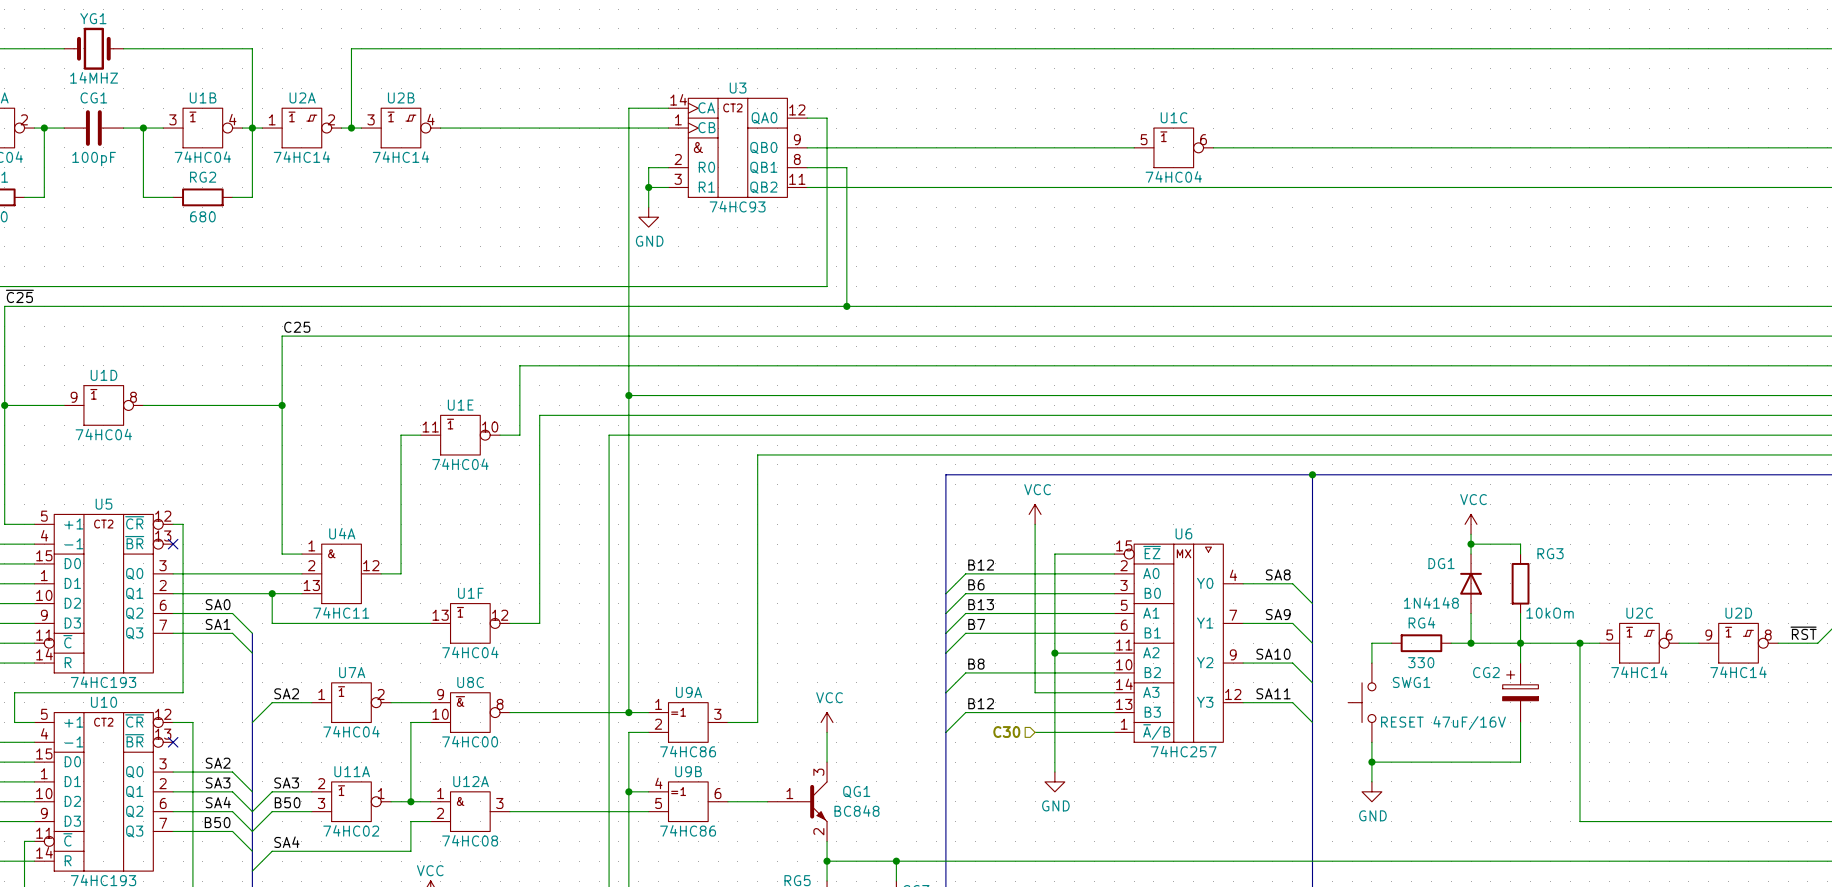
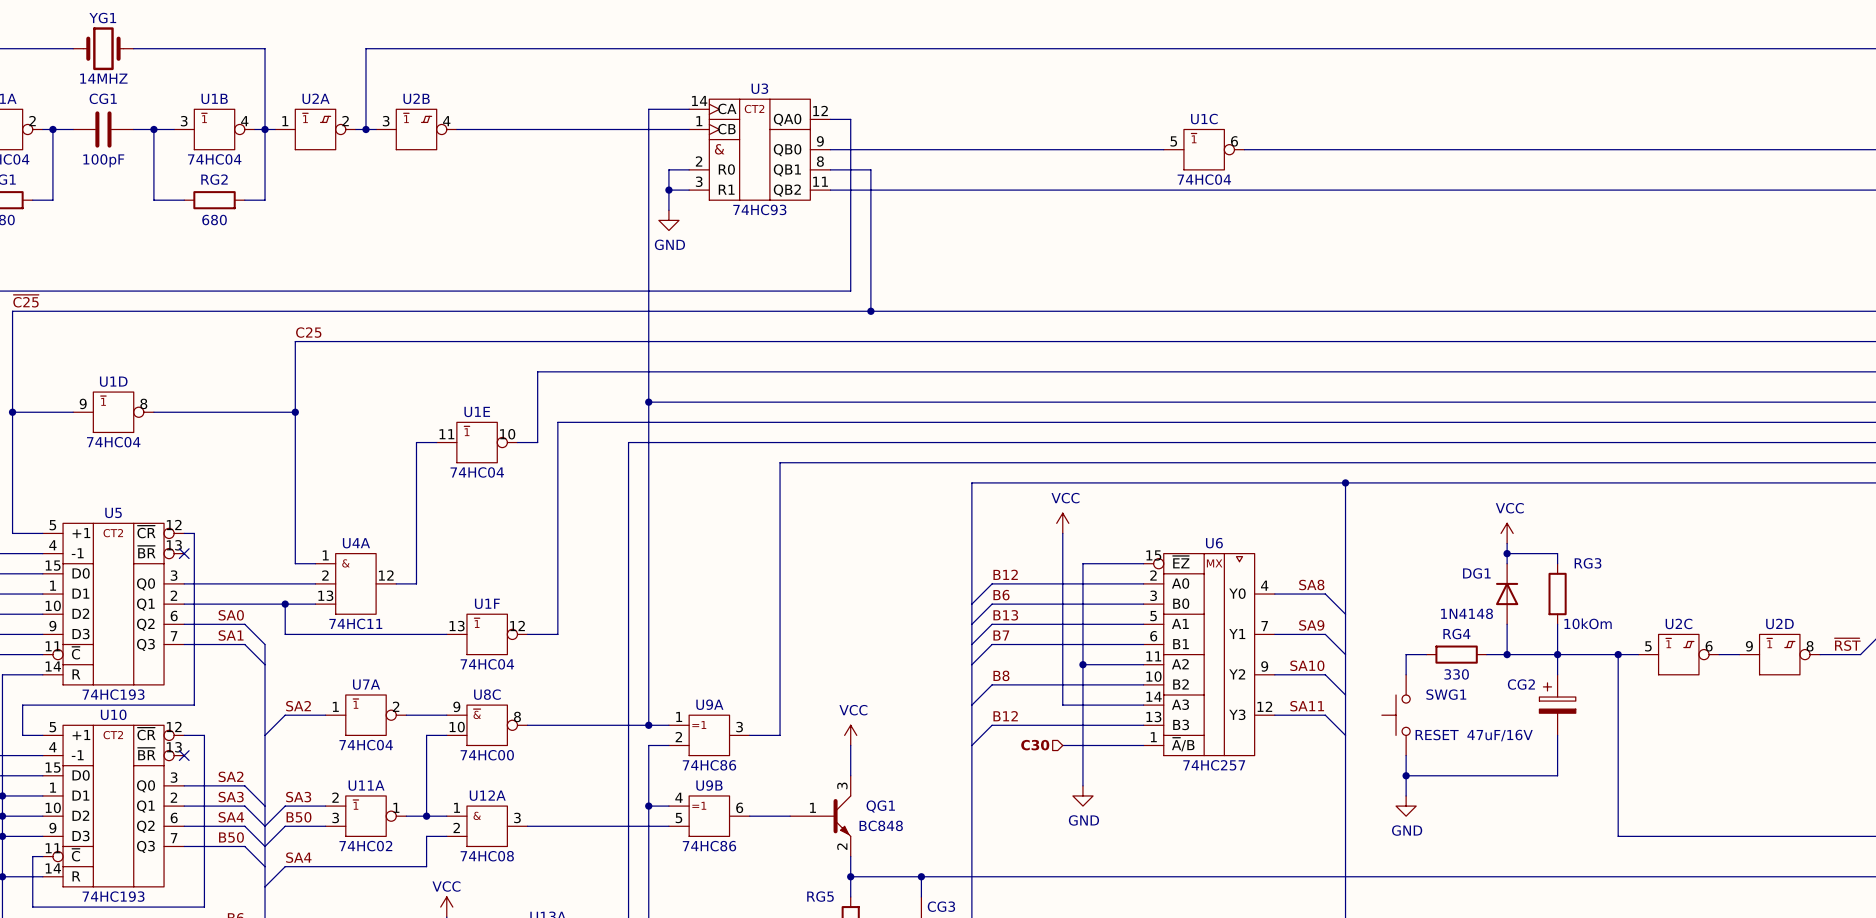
U2A value: 74HC14 (301, 157) -> none
U2B value: 74HC14 (401, 157) -> none
U2C value: 74HC14 (1639, 672) -> none
U2D value: 74HC14 (1738, 672) -> none

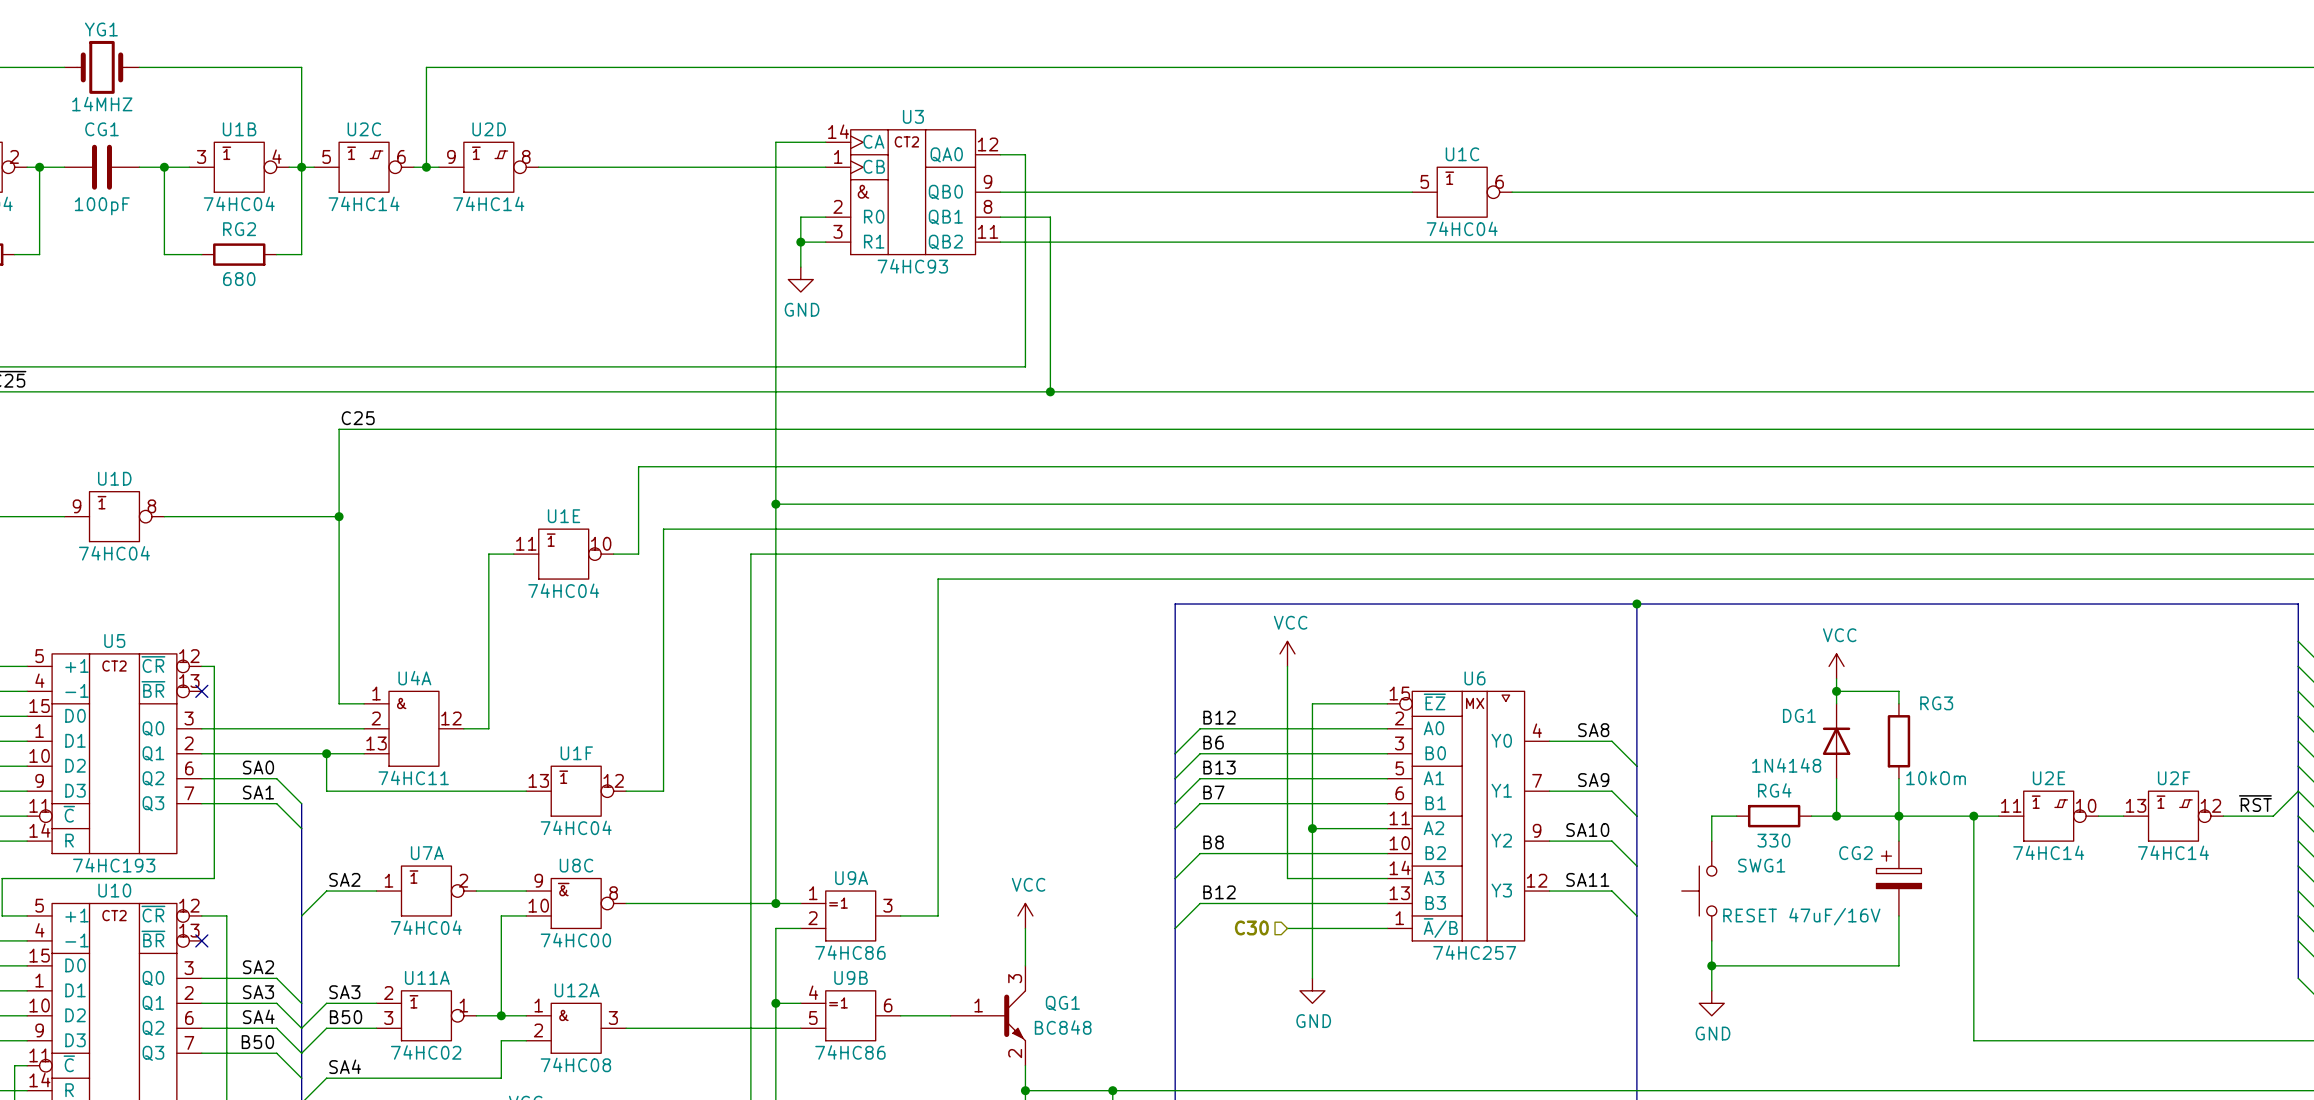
U2A: (315, 129) -> none
U2B: (416, 129) -> none
U2C value: none -> 74HC14 (364, 203)
U2D value: none -> 74HC14 (488, 203)
U2C position: (1678, 654) -> (364, 167)
U2E: none -> 74HC14 (2048, 816)
U2D position: (1779, 654) -> (488, 167)
U2F: none -> 74HC14 (2173, 816)

